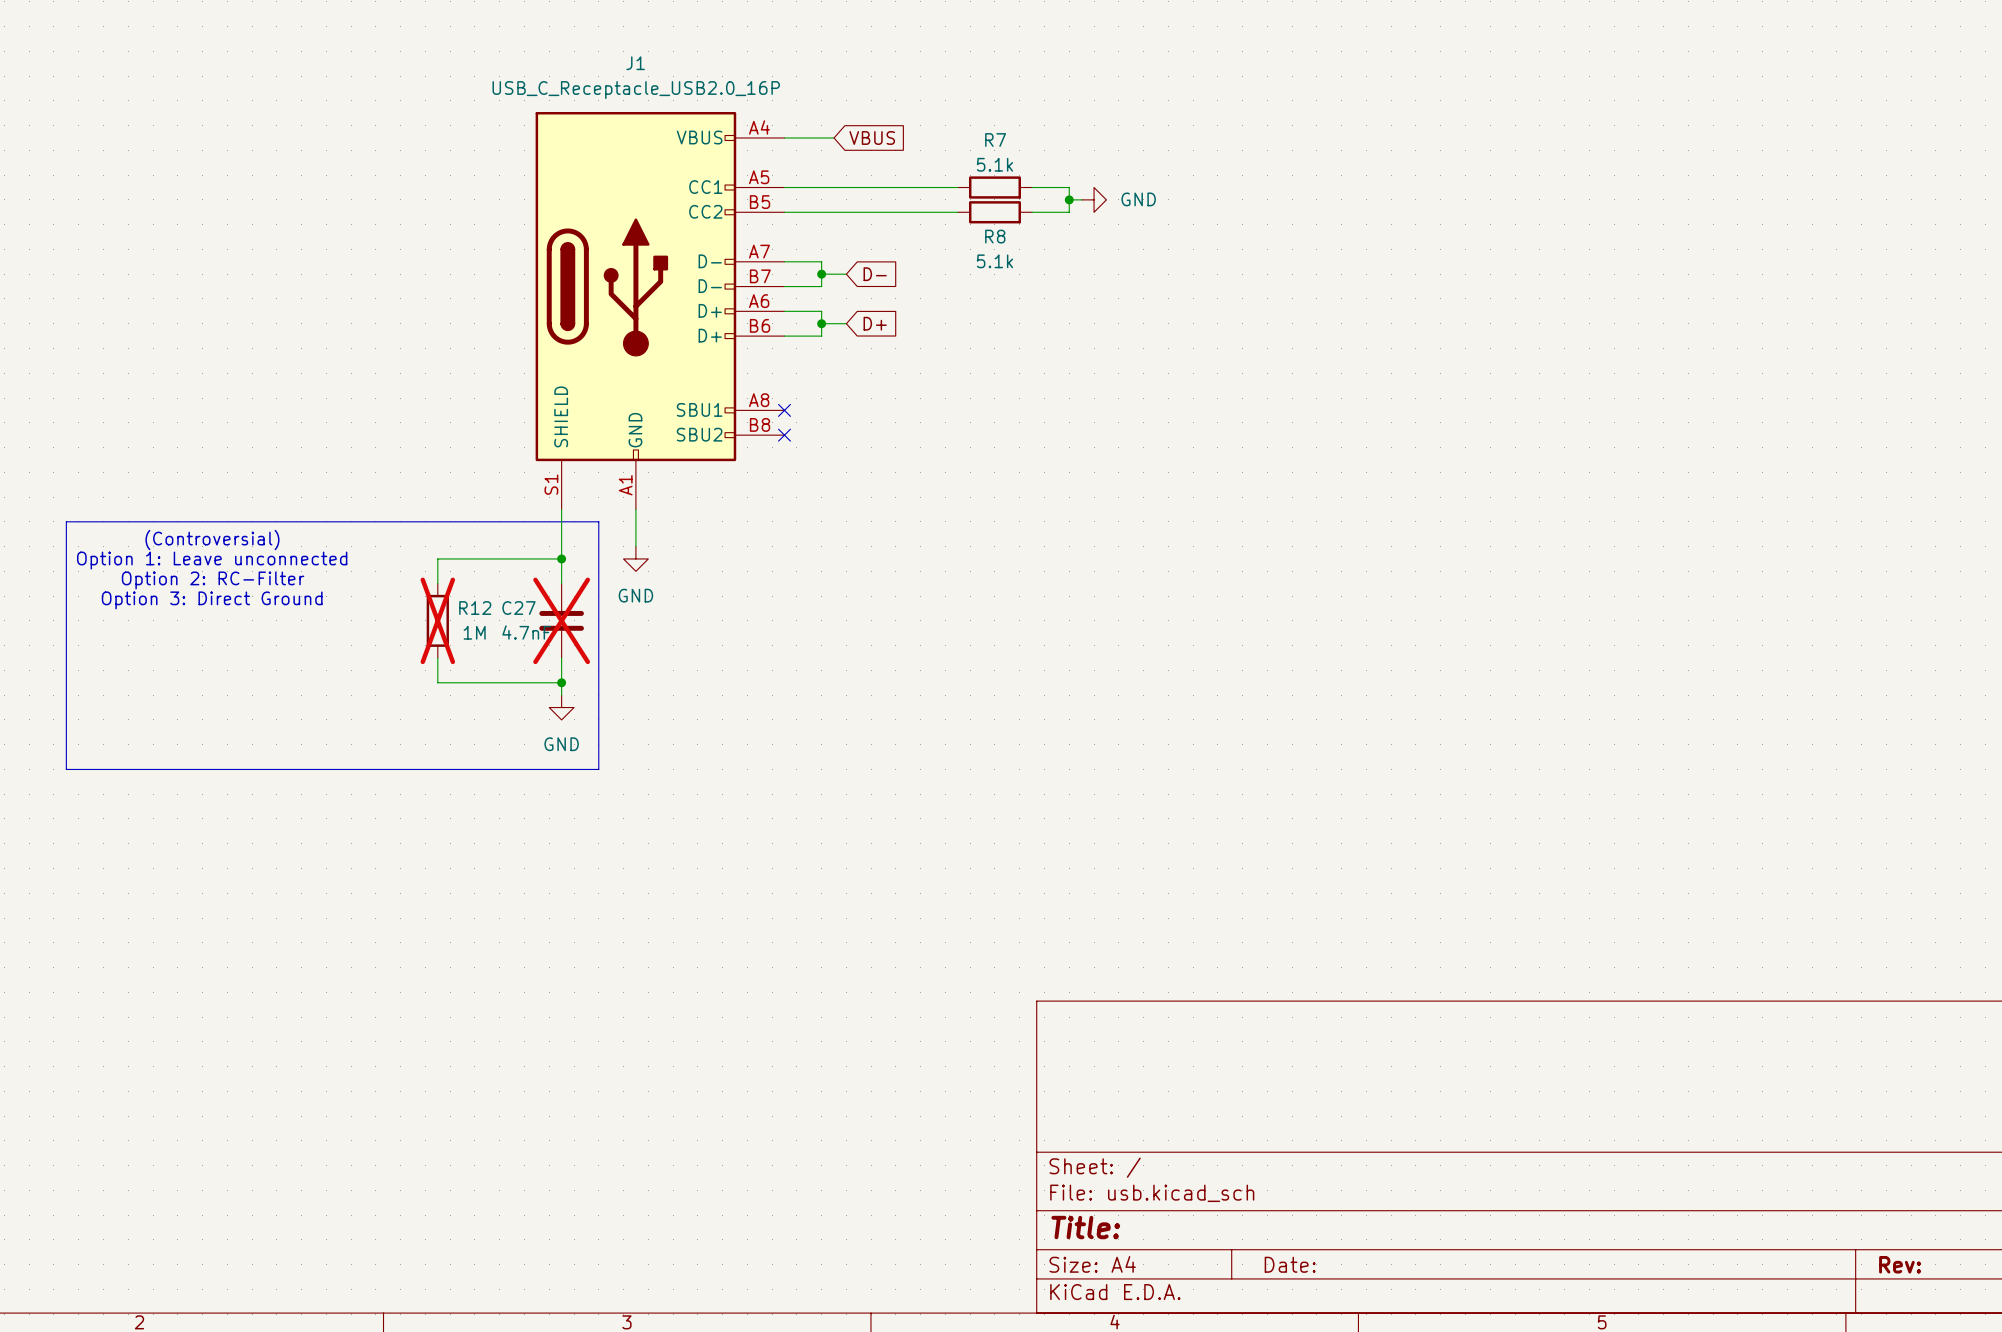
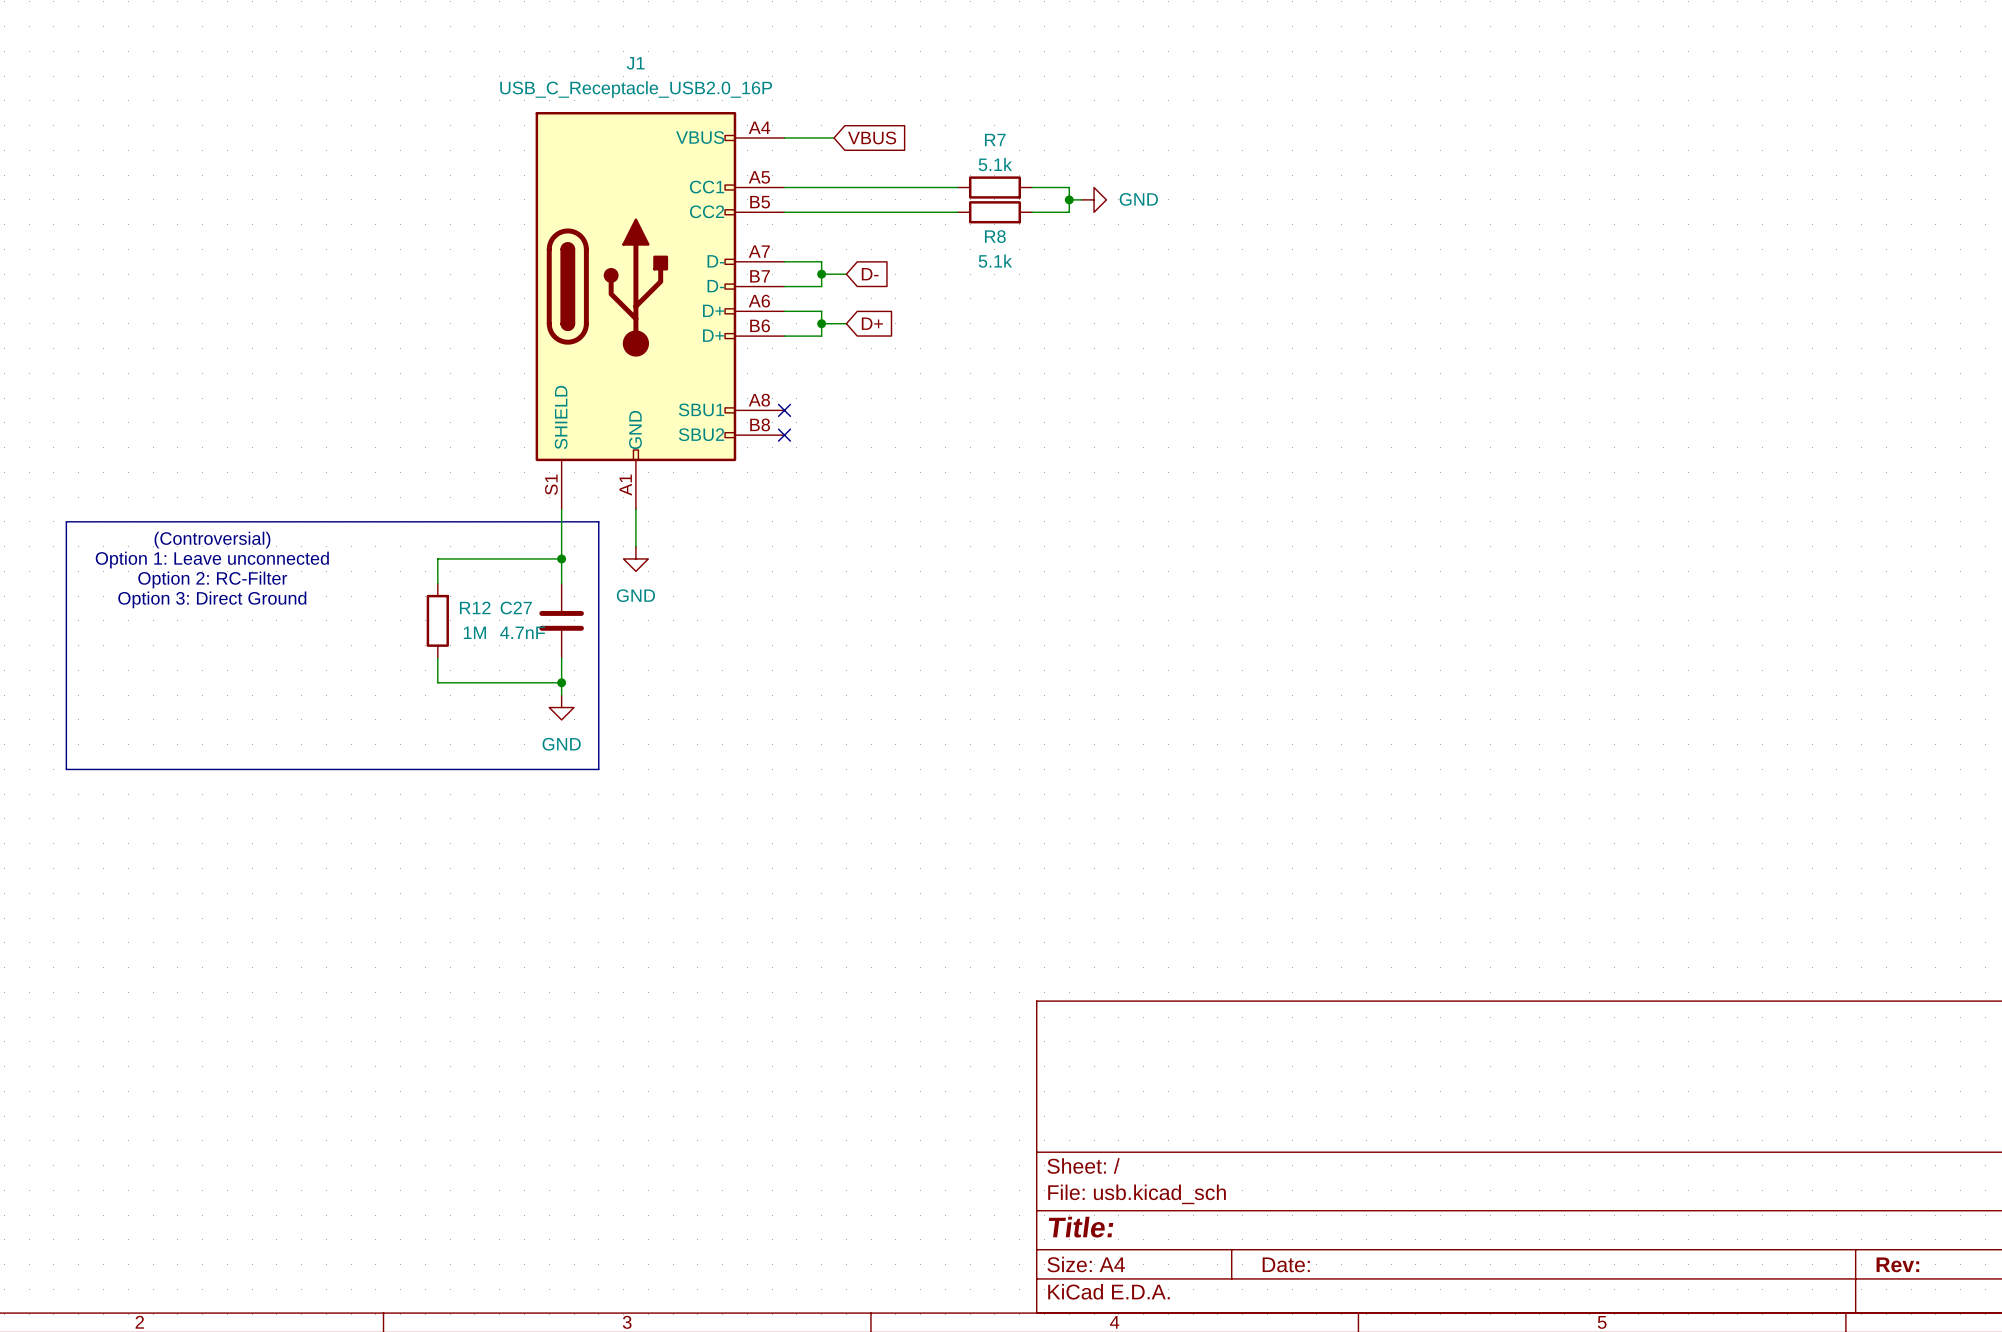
R12 do-not-place cross: (437, 620) -> none
C27 do-not-place cross: (561, 620) -> none

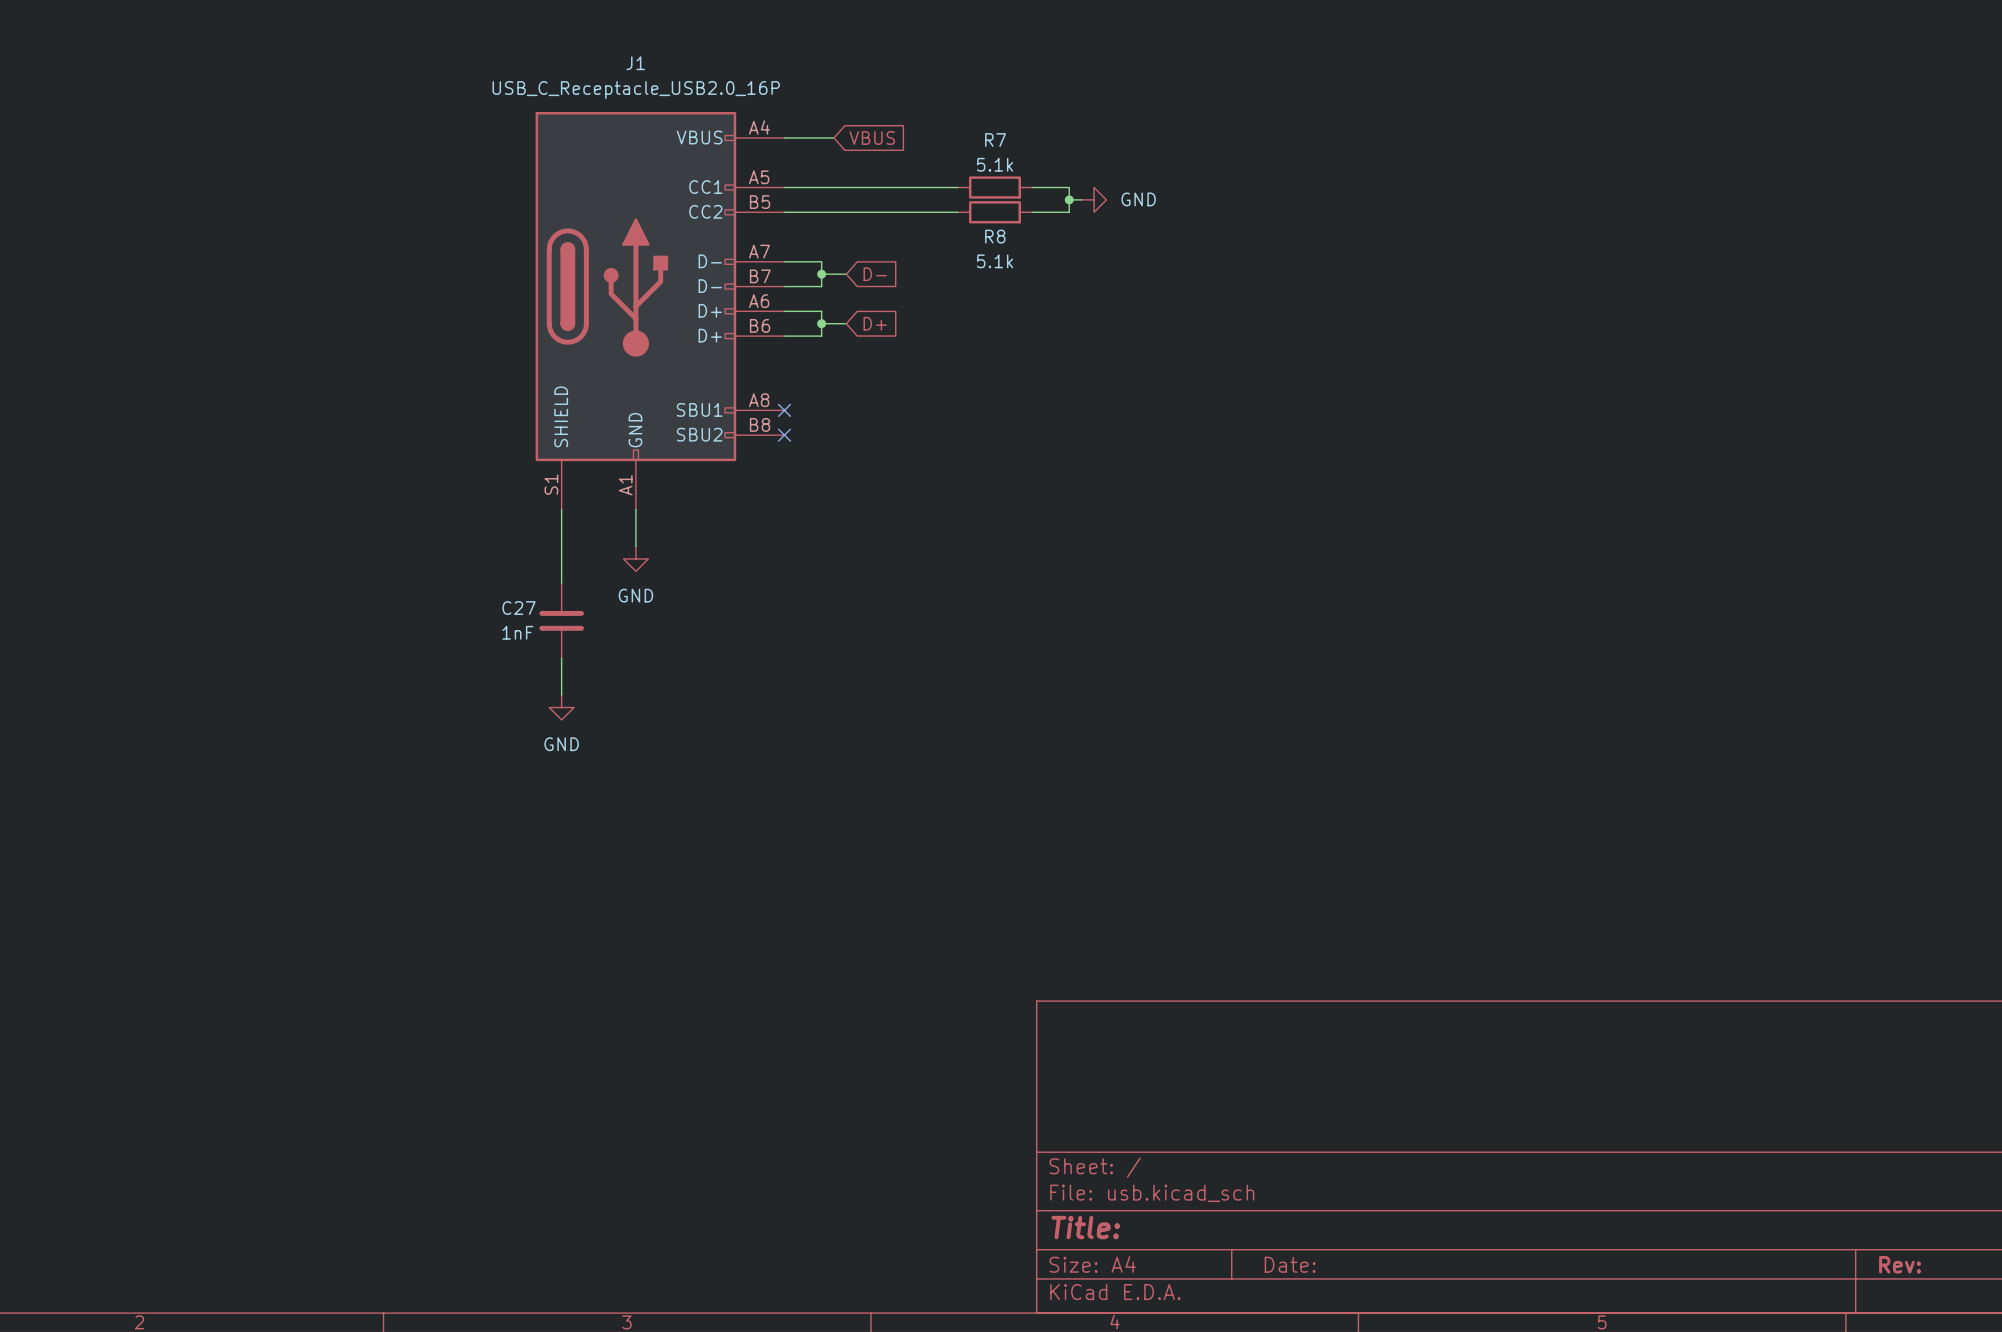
line: (66, 521) (598, 521) (598, 769) (66, 769) (66, 521) -> none
text: (Controversial) (212, 540) -> none
wire: (561, 558) (437, 558) (437, 583) -> none
junction: (561, 558) -> none
text: Option 1: Leave unconnected (212, 560) -> none
text: Option 2: RC-Filter (212, 579) -> none
text: Option 3: Direct Ground (212, 599) -> none
R12: 1M (437, 620) -> none
C27 value: 4.7nF (522, 632) -> 1nF (517, 632)
wire: (437, 658) (437, 682) (561, 682) -> none
junction: (561, 682) -> none

